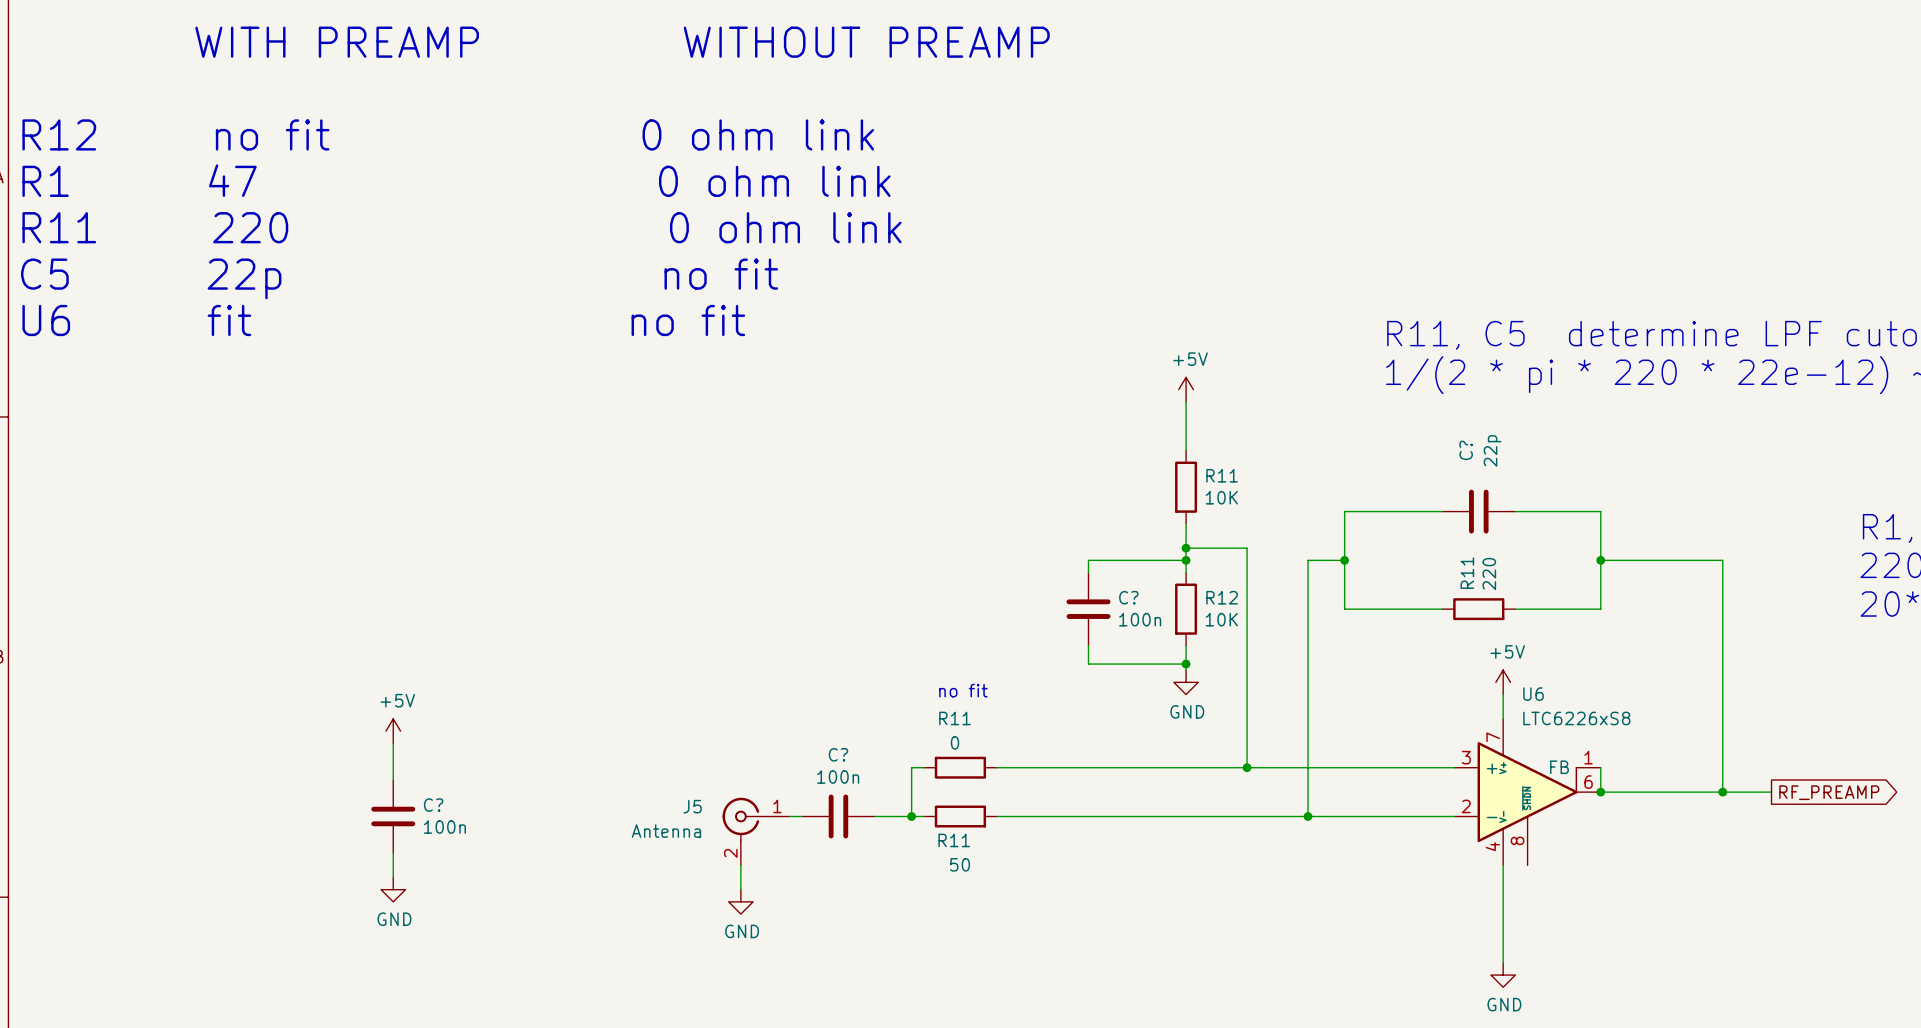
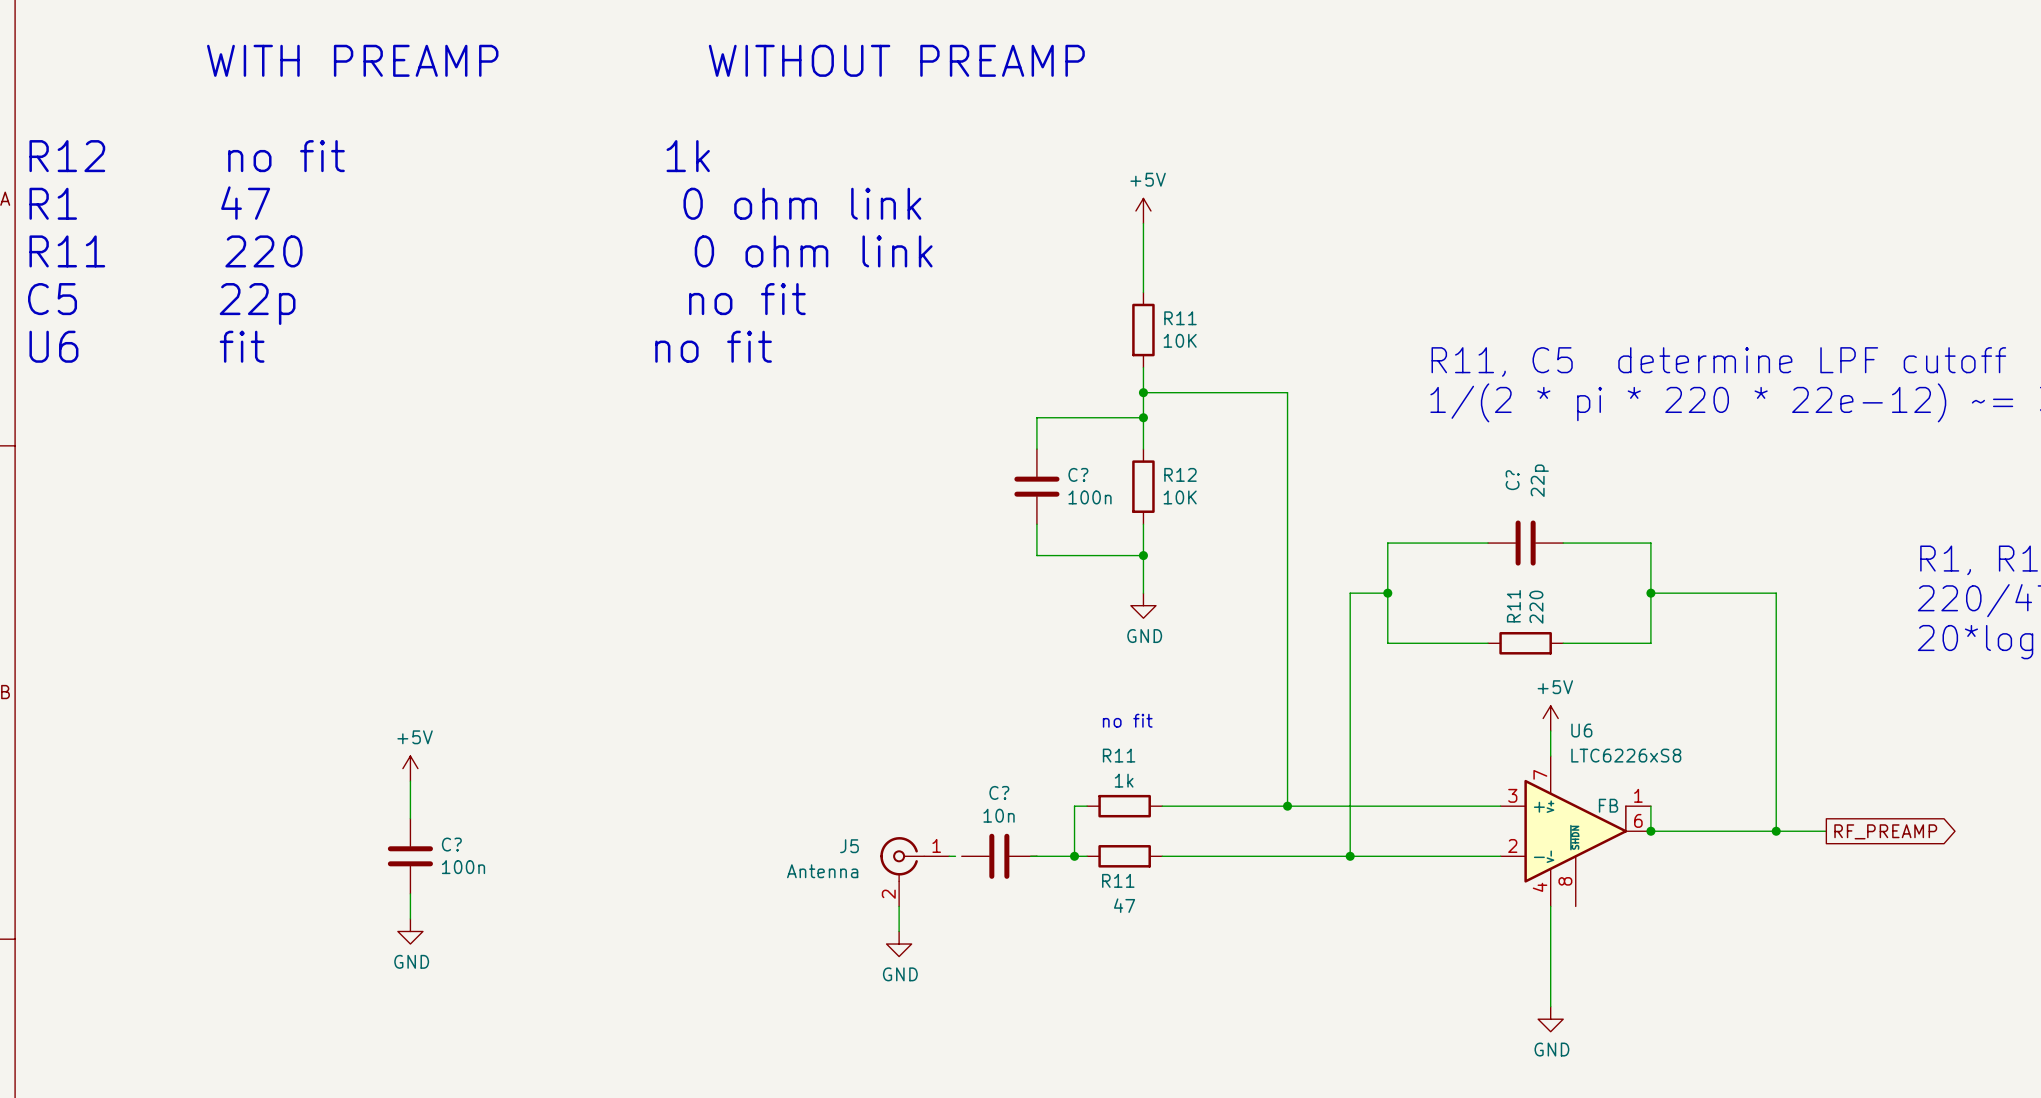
text: R12 no fit 0 ohm link (448, 134) -> R12 no fit 1k (369, 156)
wire: none -> (1143, 223) (1143, 292)
wire: none -> (1143, 367) (1143, 449)
junction: none -> (1143, 392)
wire: none -> (1143, 417) (1036, 417) (1036, 449)
junction: none -> (1143, 417)
power symbol position: +5V (1186, 389) -> +5V (1143, 210)
wire: (1186, 401) (1186, 450) -> none
R11 position: (1186, 487) -> (1143, 330)
wire: none -> (1036, 524) (1036, 555) (1143, 555)
wire: none -> (1143, 524) (1143, 593)
junction: none -> (1143, 555)
wire: (1186, 523) (1186, 572) -> none
wire: (1186, 548) (1247, 548) -> (1143, 392) (1287, 392) (1287, 580)
junction: (1186, 548) -> none
wire: (1186, 560) (1088, 560) (1088, 572) -> none
junction: (1186, 560) -> none
C? position: (1088, 609) -> (1036, 486)
R12 position: (1186, 609) -> (1143, 486)
wire: (1088, 645) (1088, 664) (1186, 664) -> none
wire: (1186, 645) (1186, 670) -> none
junction: (1186, 664) -> none
power symbol position: GND (1186, 682) -> GND (1143, 605)
text position: no fit (963, 690) -> no fit (1127, 720)
wire: (923, 767) (911, 767) (911, 816) -> none
R11: 0 (960, 767) -> none
wire: (997, 767) (1039, 767) -> (1074, 856) (1074, 806)
wire: (1051, 767) (1125, 767) -> none
R11: none -> 1k (1124, 806)
wire: (789, 816) (801, 816) -> none
C?: 100n (838, 816) -> none
junction: (911, 816) -> none
R11: 50 (960, 816) -> none
C?: none -> 10n (999, 856)
junction: none -> (1074, 856)
wire: (1051, 816) (1125, 816) -> none
R11: none -> 47 (1124, 856)
J5 position: (756, 831) -> (914, 871)
wire: (740, 865) (740, 889) -> (899, 906) (899, 931)
power symbol position: GND (740, 901) -> GND (899, 944)

